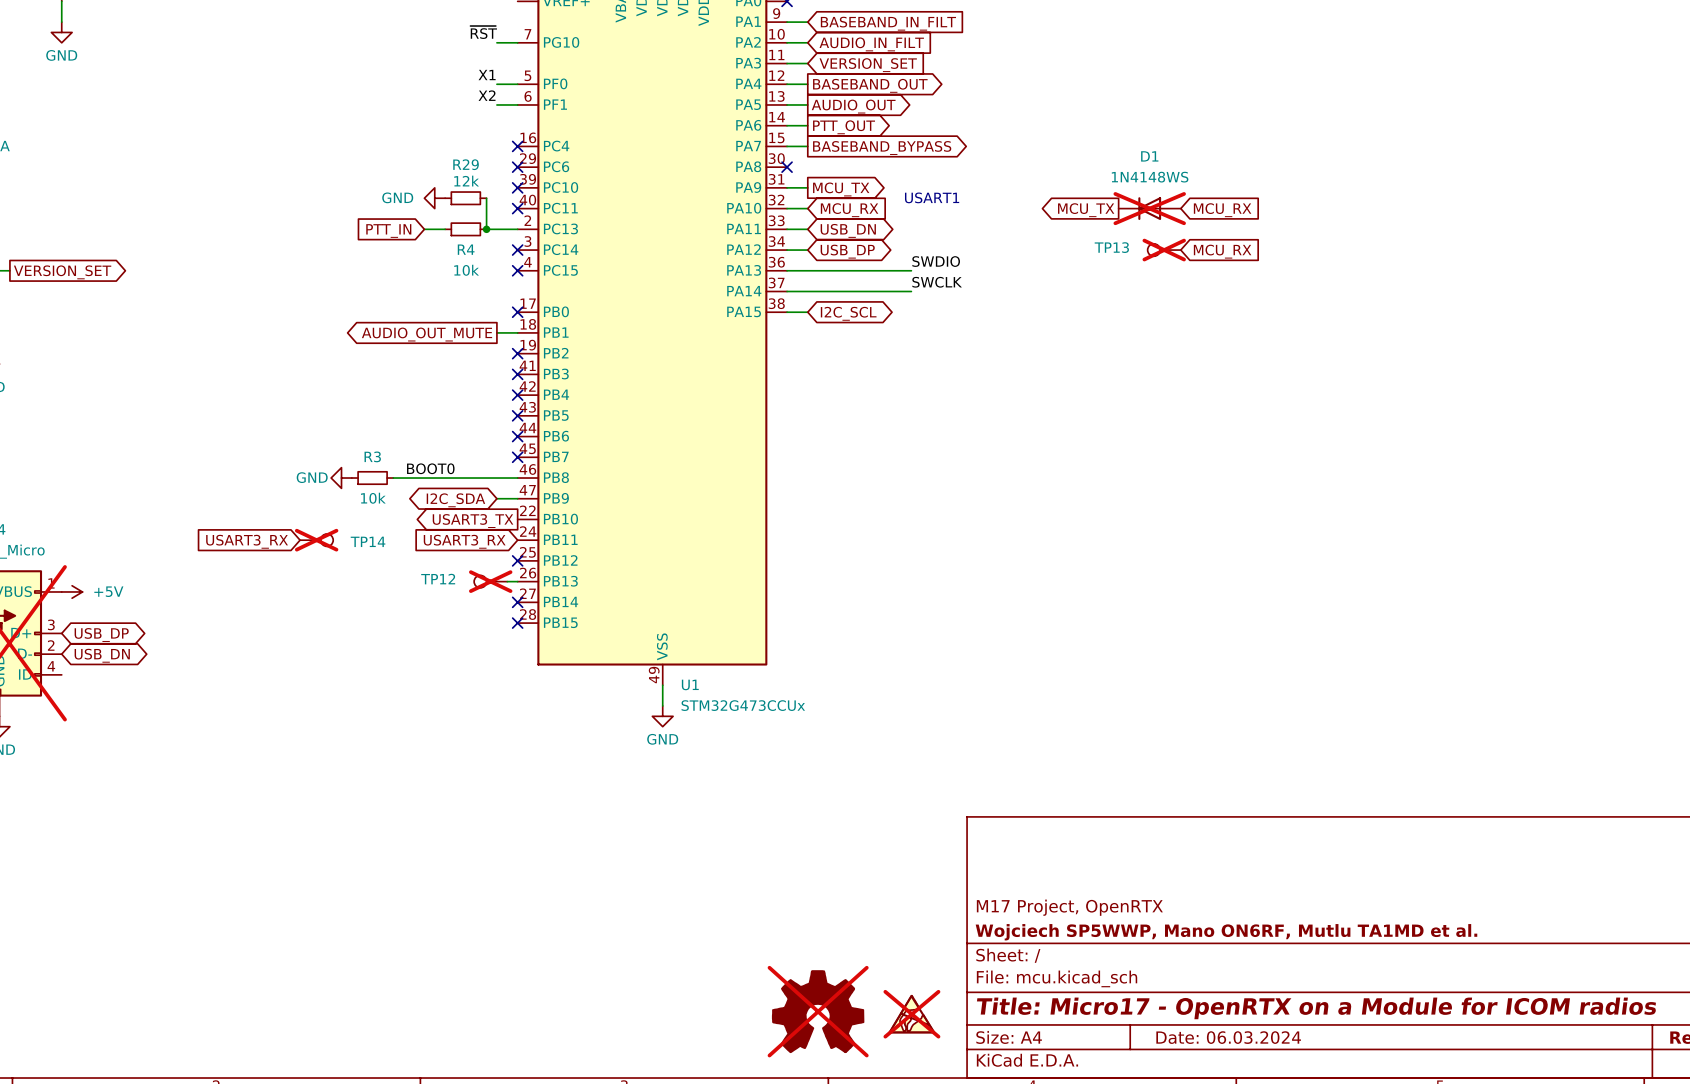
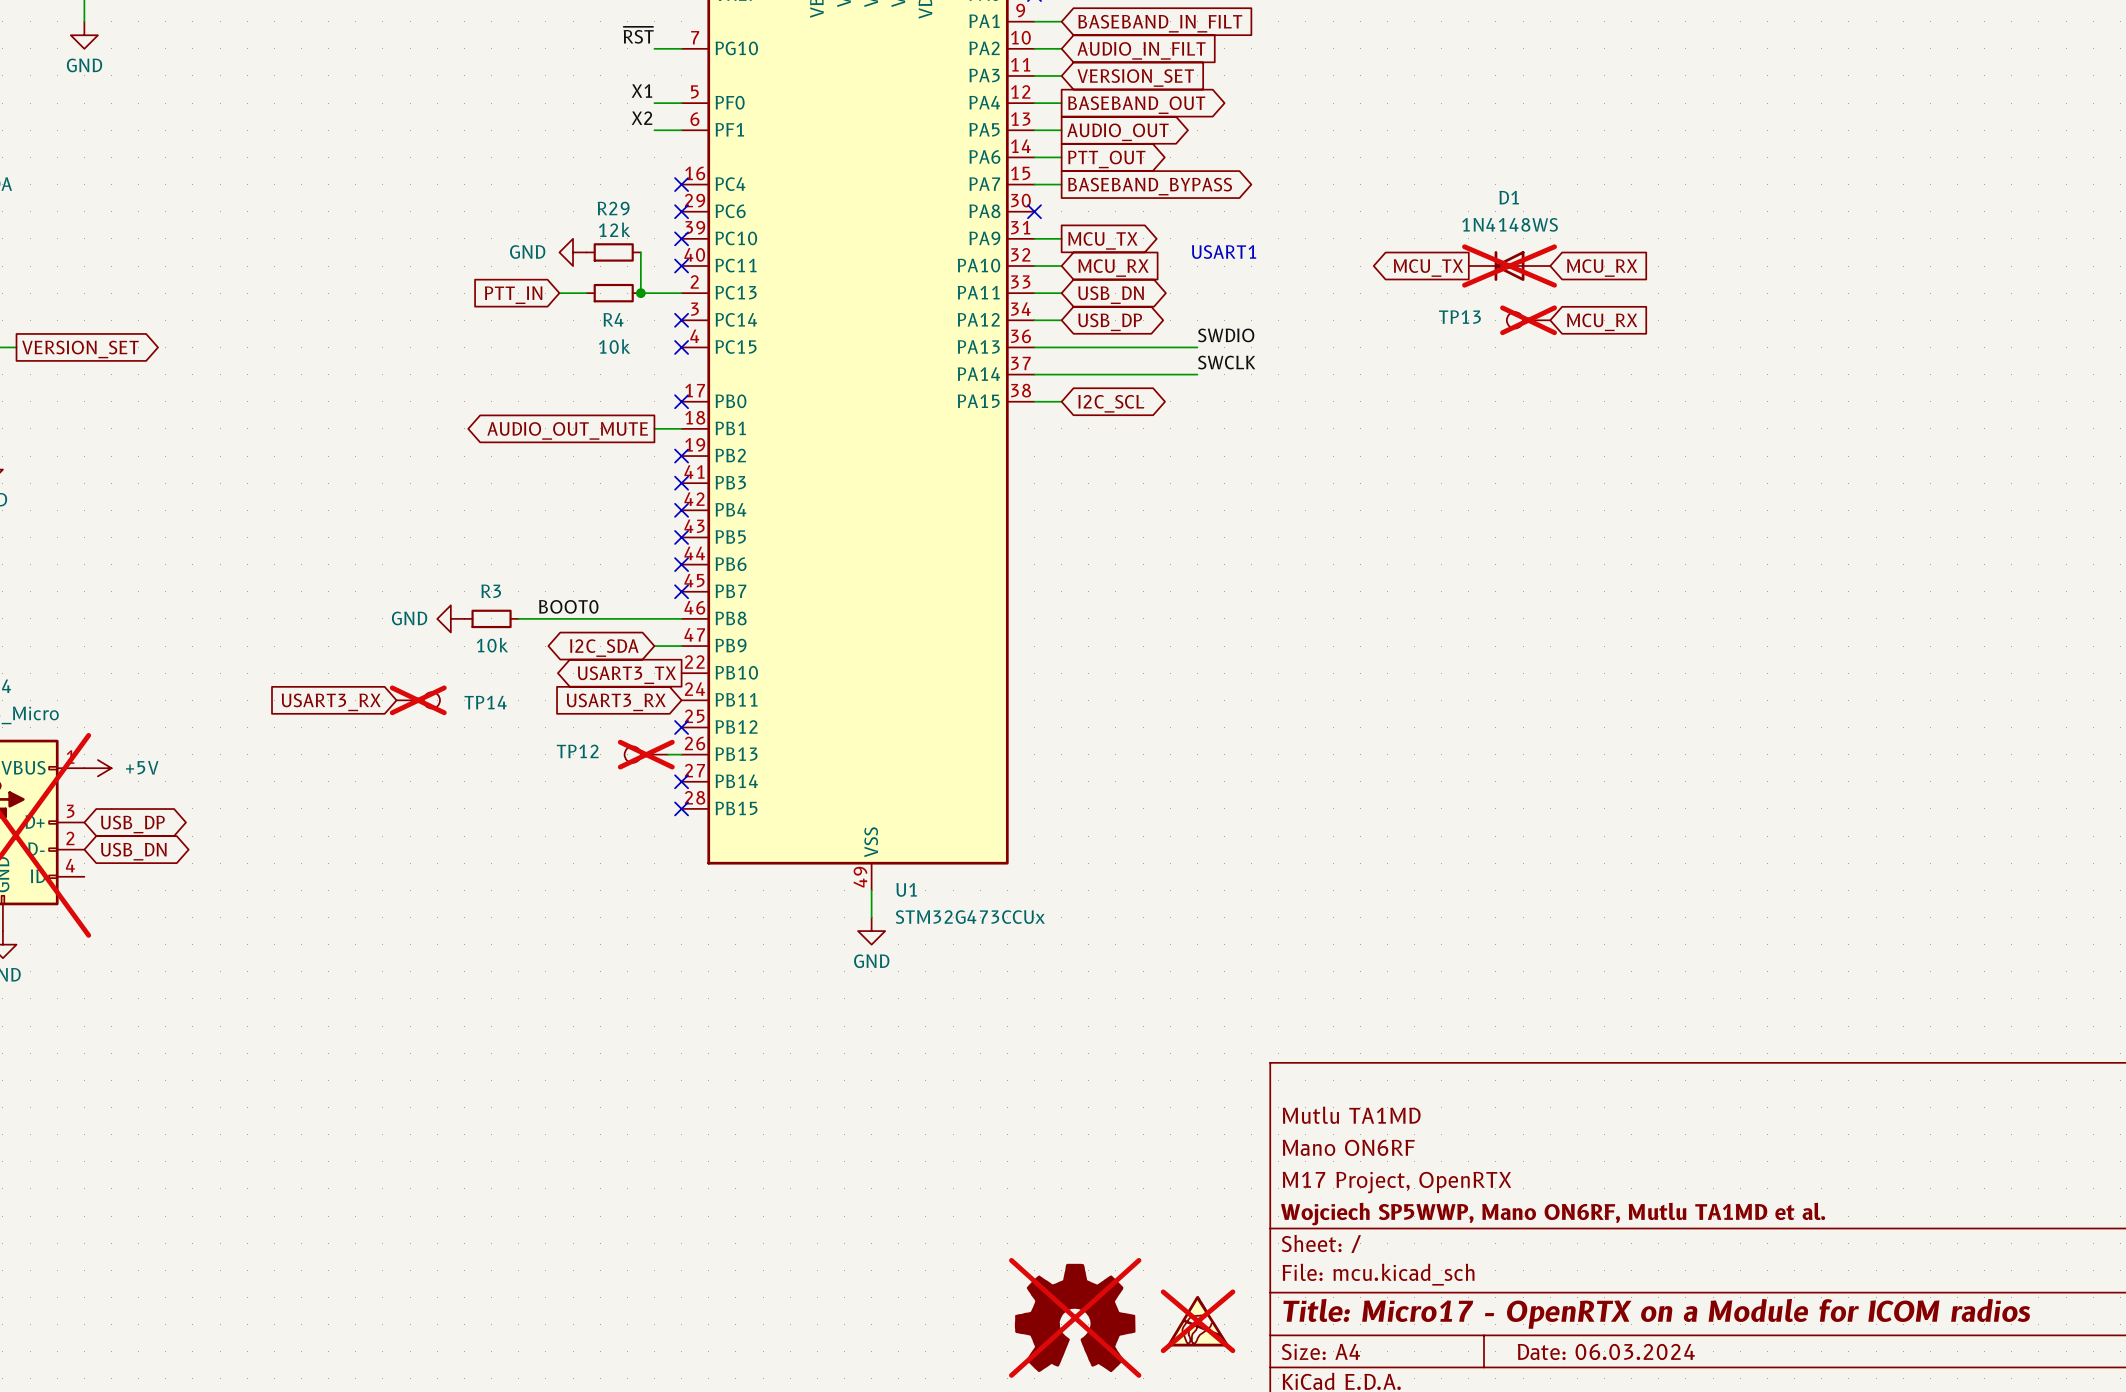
title block: none -> Mutlu TA1MD (1351, 1115)
title block: none -> Mano ON6RF (1348, 1147)

